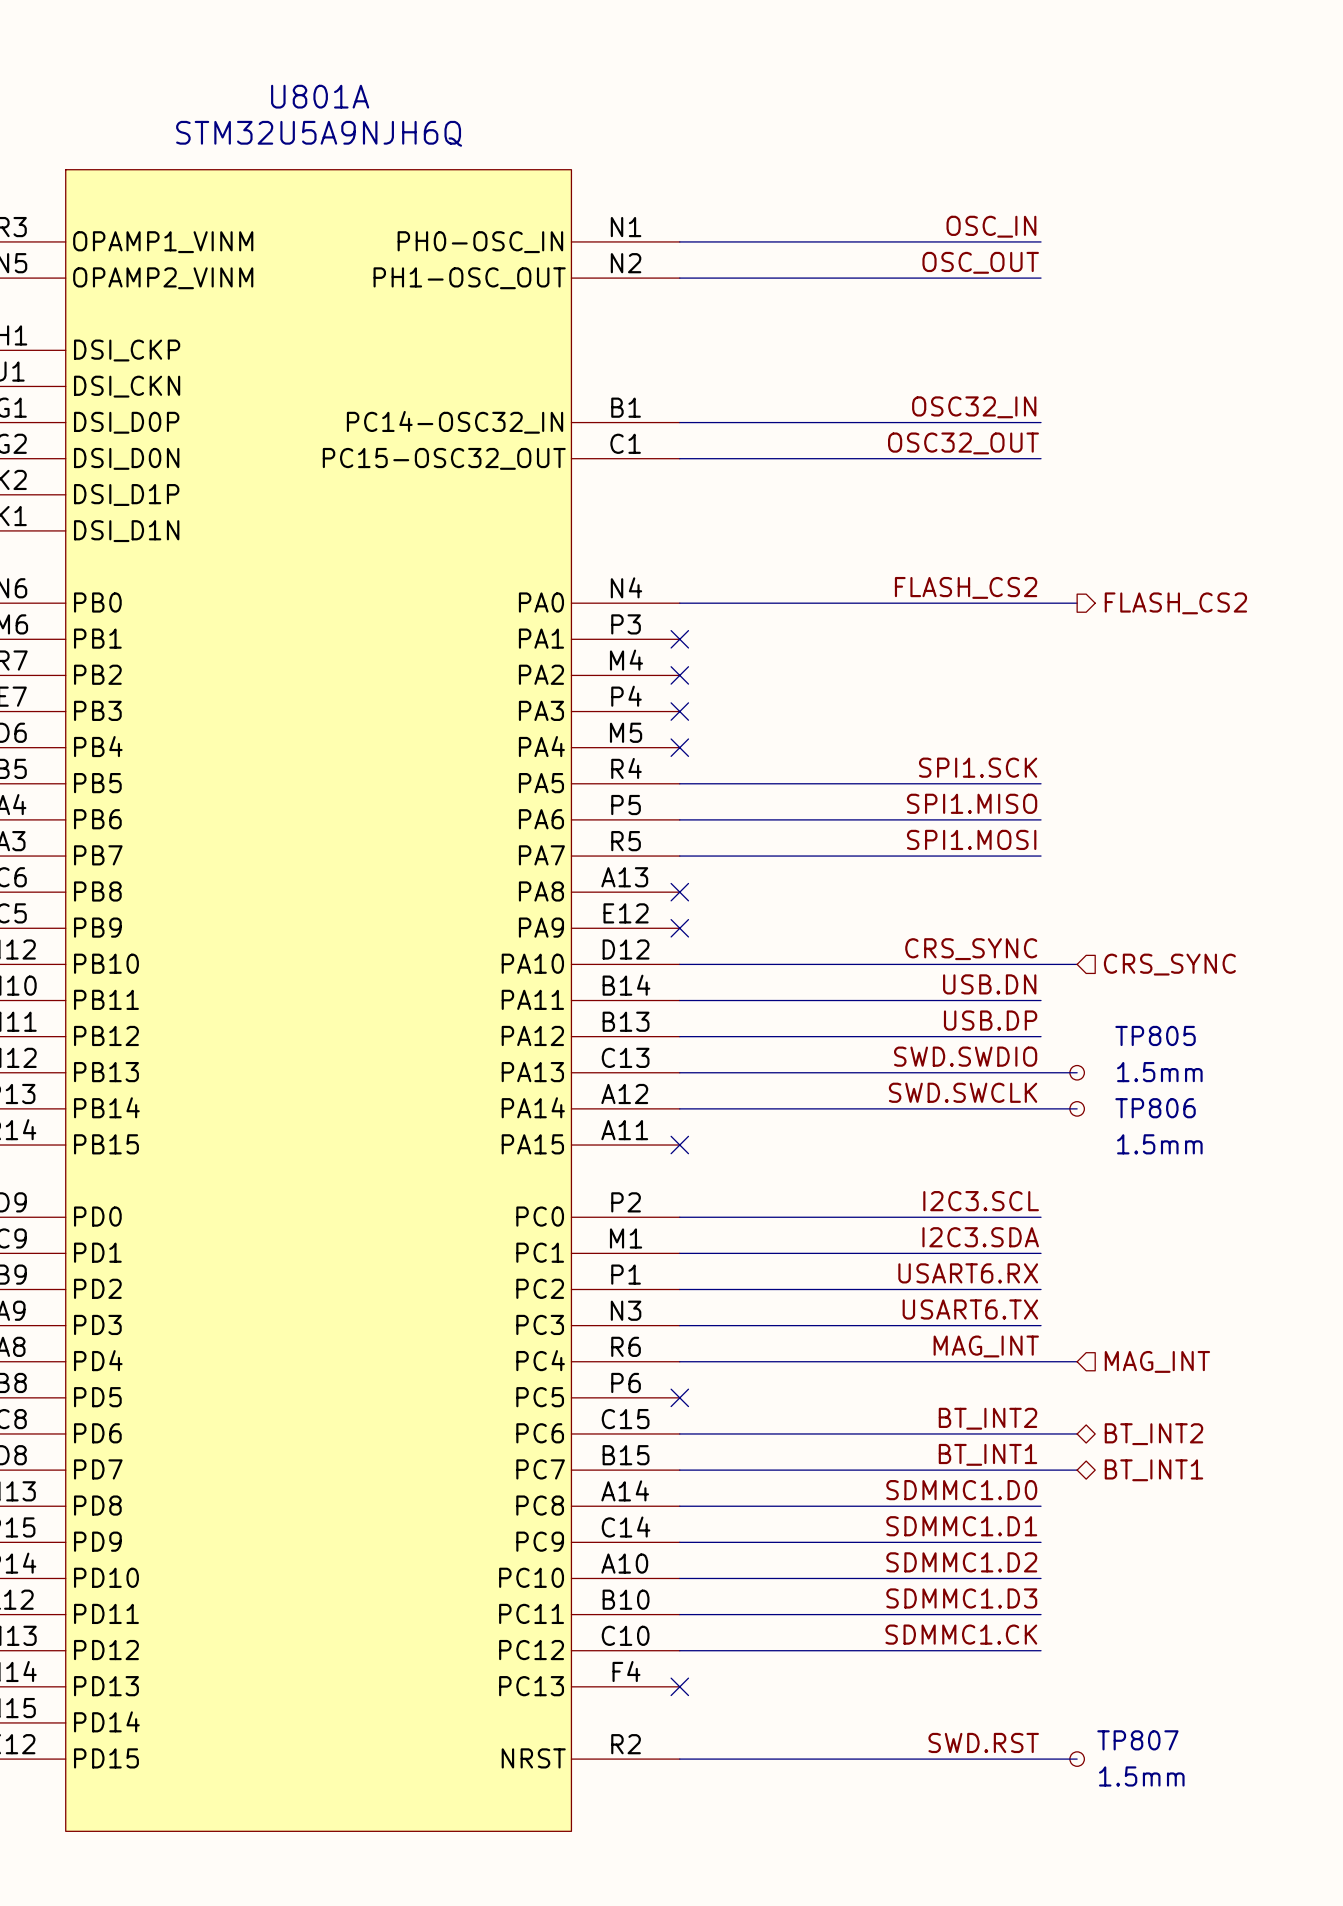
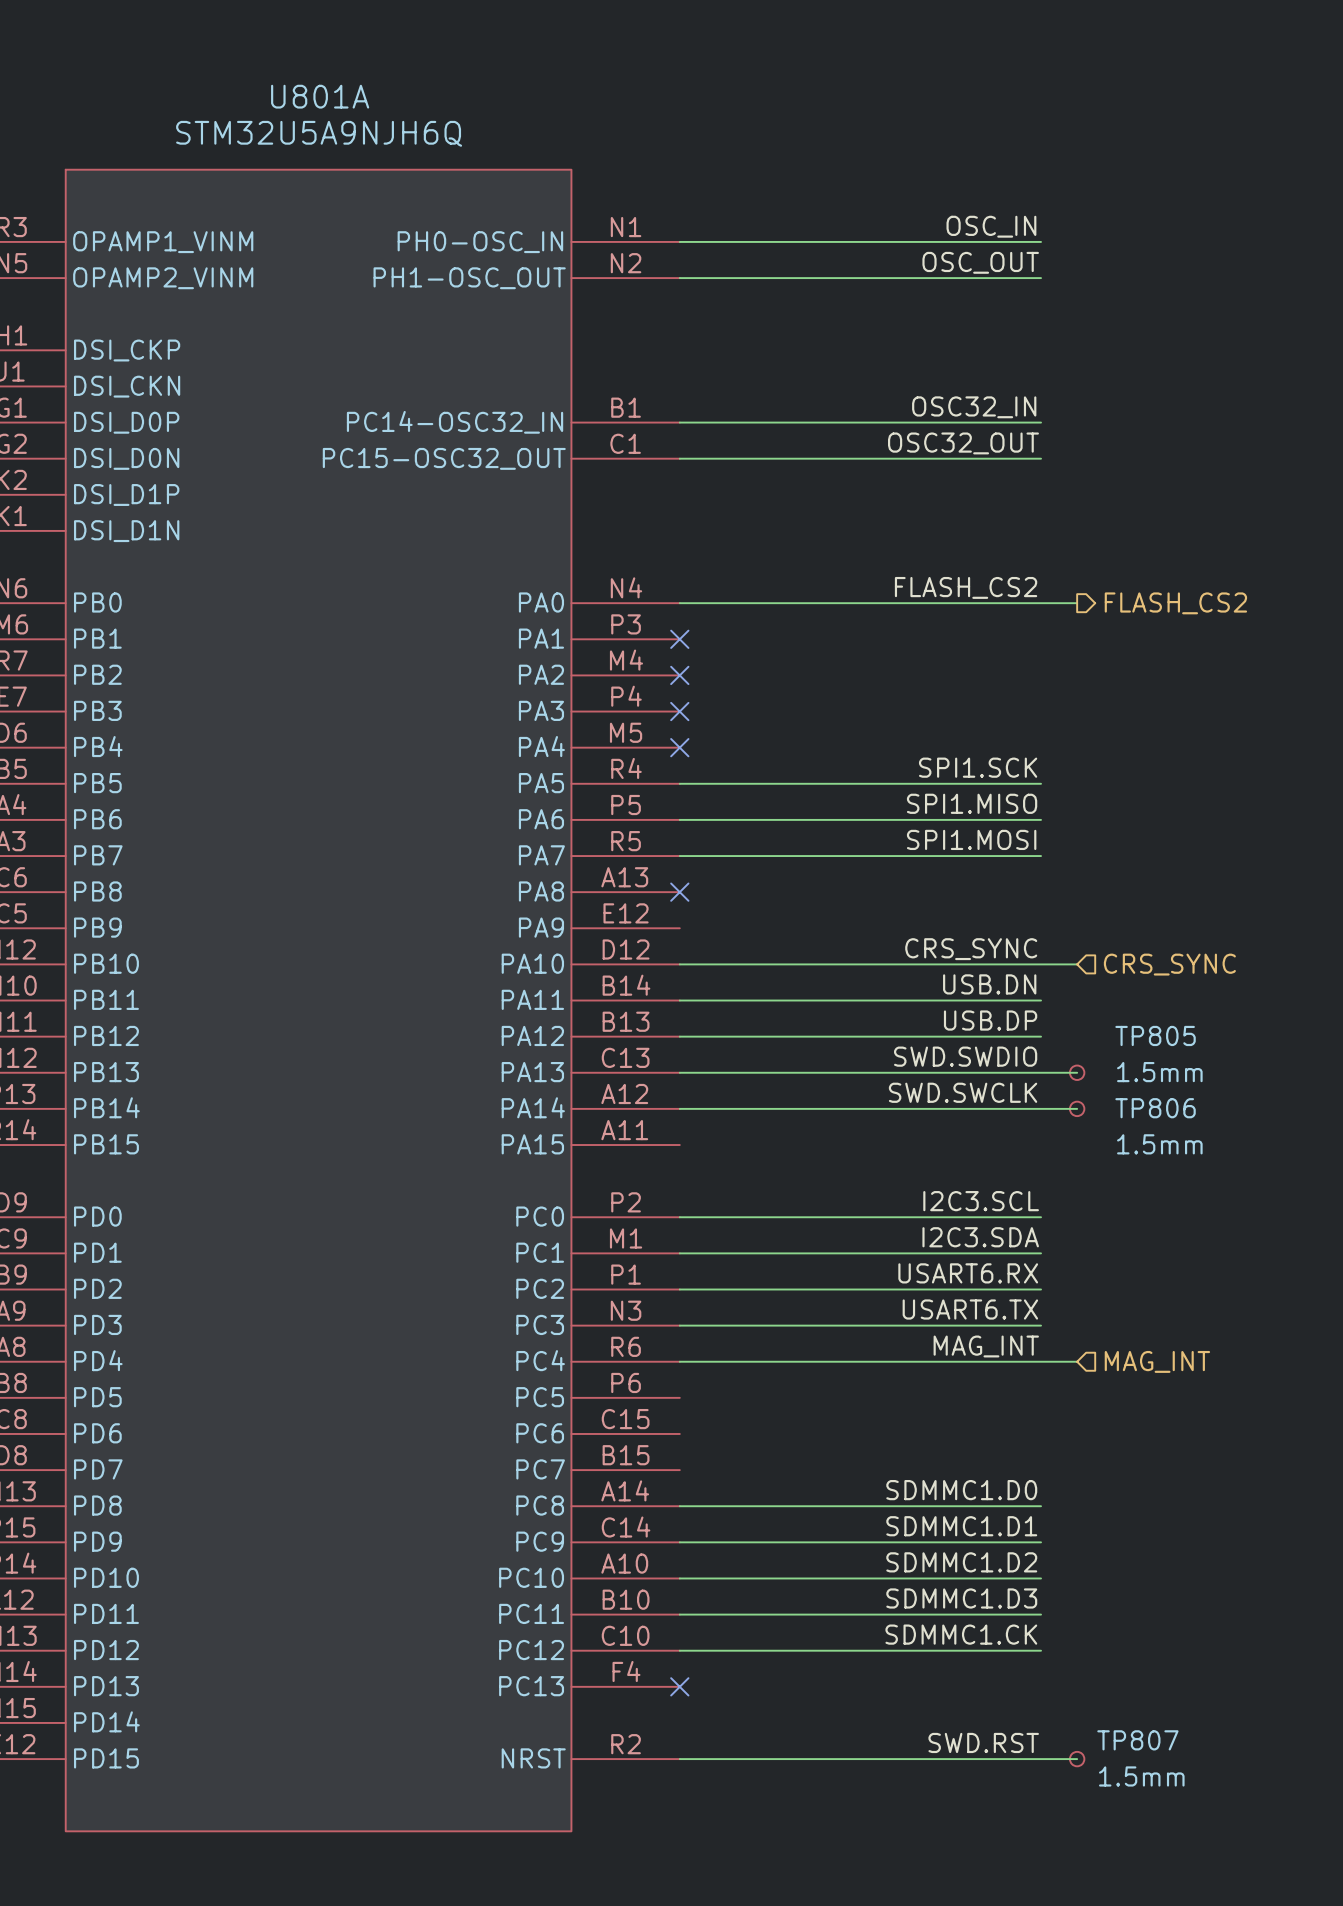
no-connect mark: (679, 928) -> none
no-connect mark: (679, 1145) -> none
no-connect mark: (679, 1397) -> none
label: BT_INT2 (987, 1418) -> none
wire: (679, 1433) (1077, 1433) -> none
hierarchical label: BT_INT2 (1153, 1434) -> none
label: BT_INT1 (987, 1454) -> none
wire: (679, 1470) (1077, 1470) -> none
hierarchical label: BT_INT1 (1153, 1470) -> none

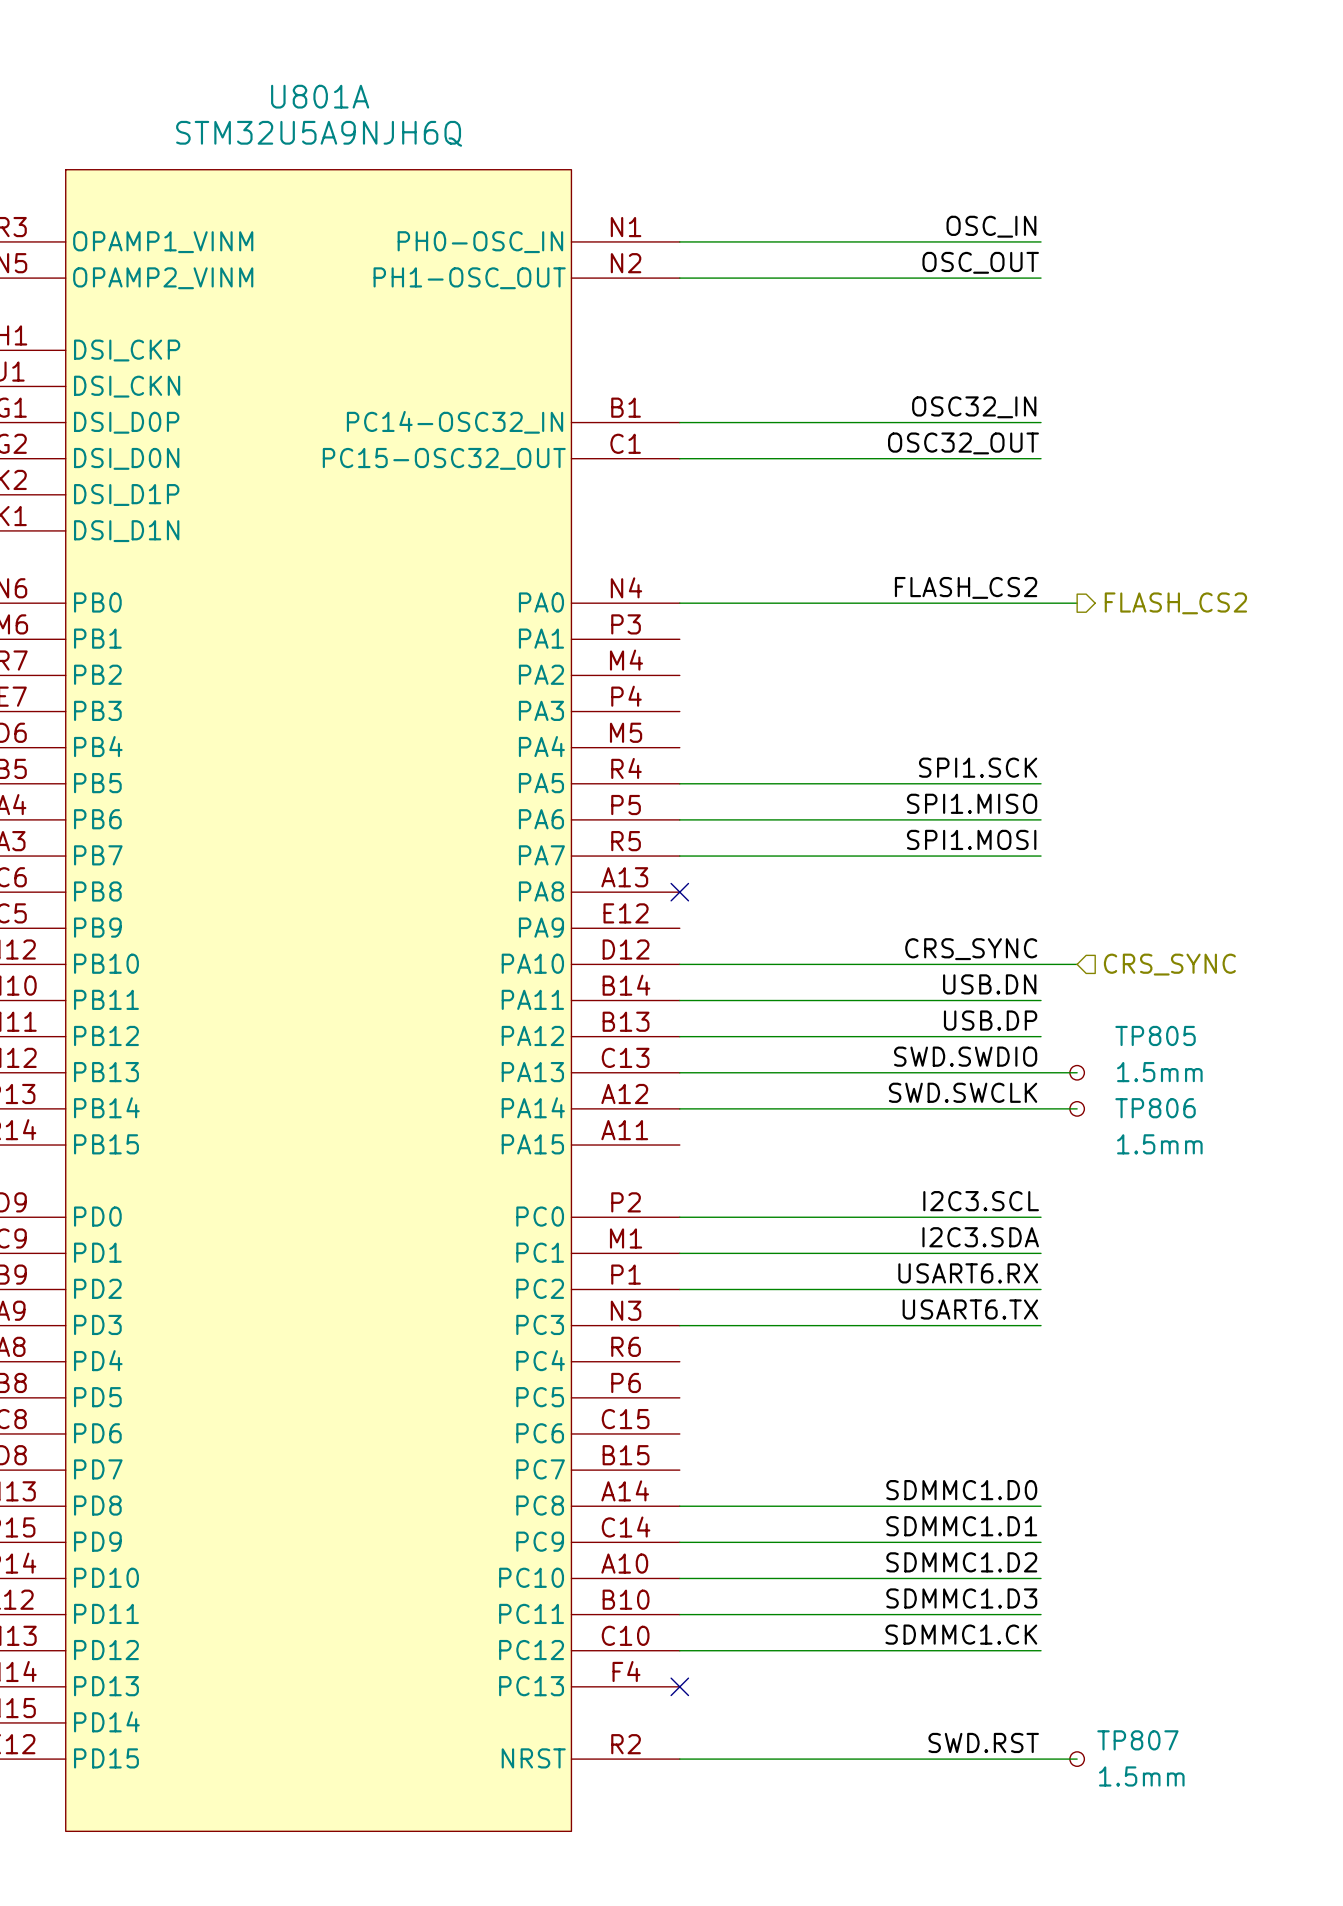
no-connect mark: (679, 639) -> none
no-connect mark: (679, 675) -> none
no-connect mark: (679, 711) -> none
no-connect mark: (679, 747) -> none
label: MAG_INT (986, 1346) -> none
wire: (679, 1361) (1077, 1361) -> none
hierarchical label: MAG_INT (1157, 1361) -> none

